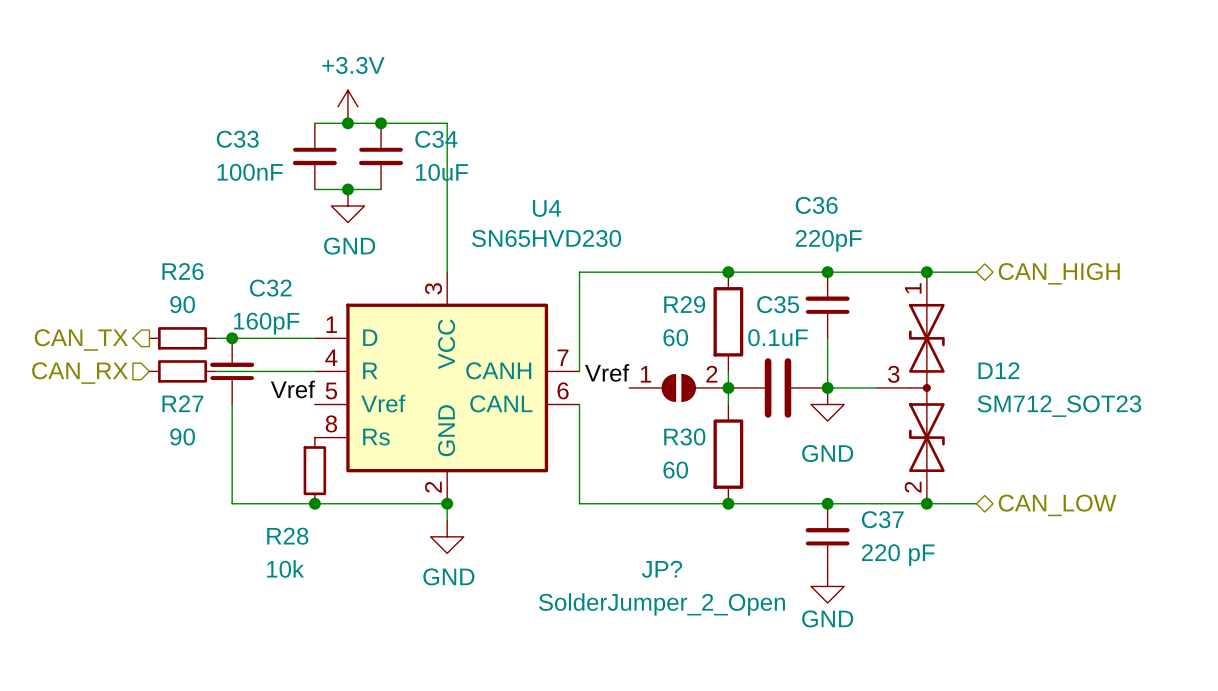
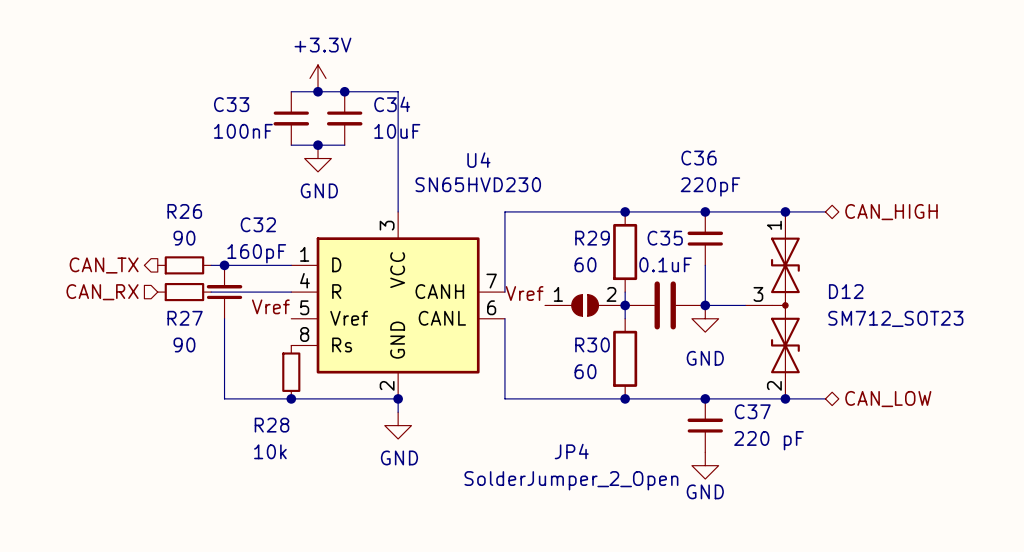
JP? name: JP? (661, 569) -> JP4 (571, 451)

